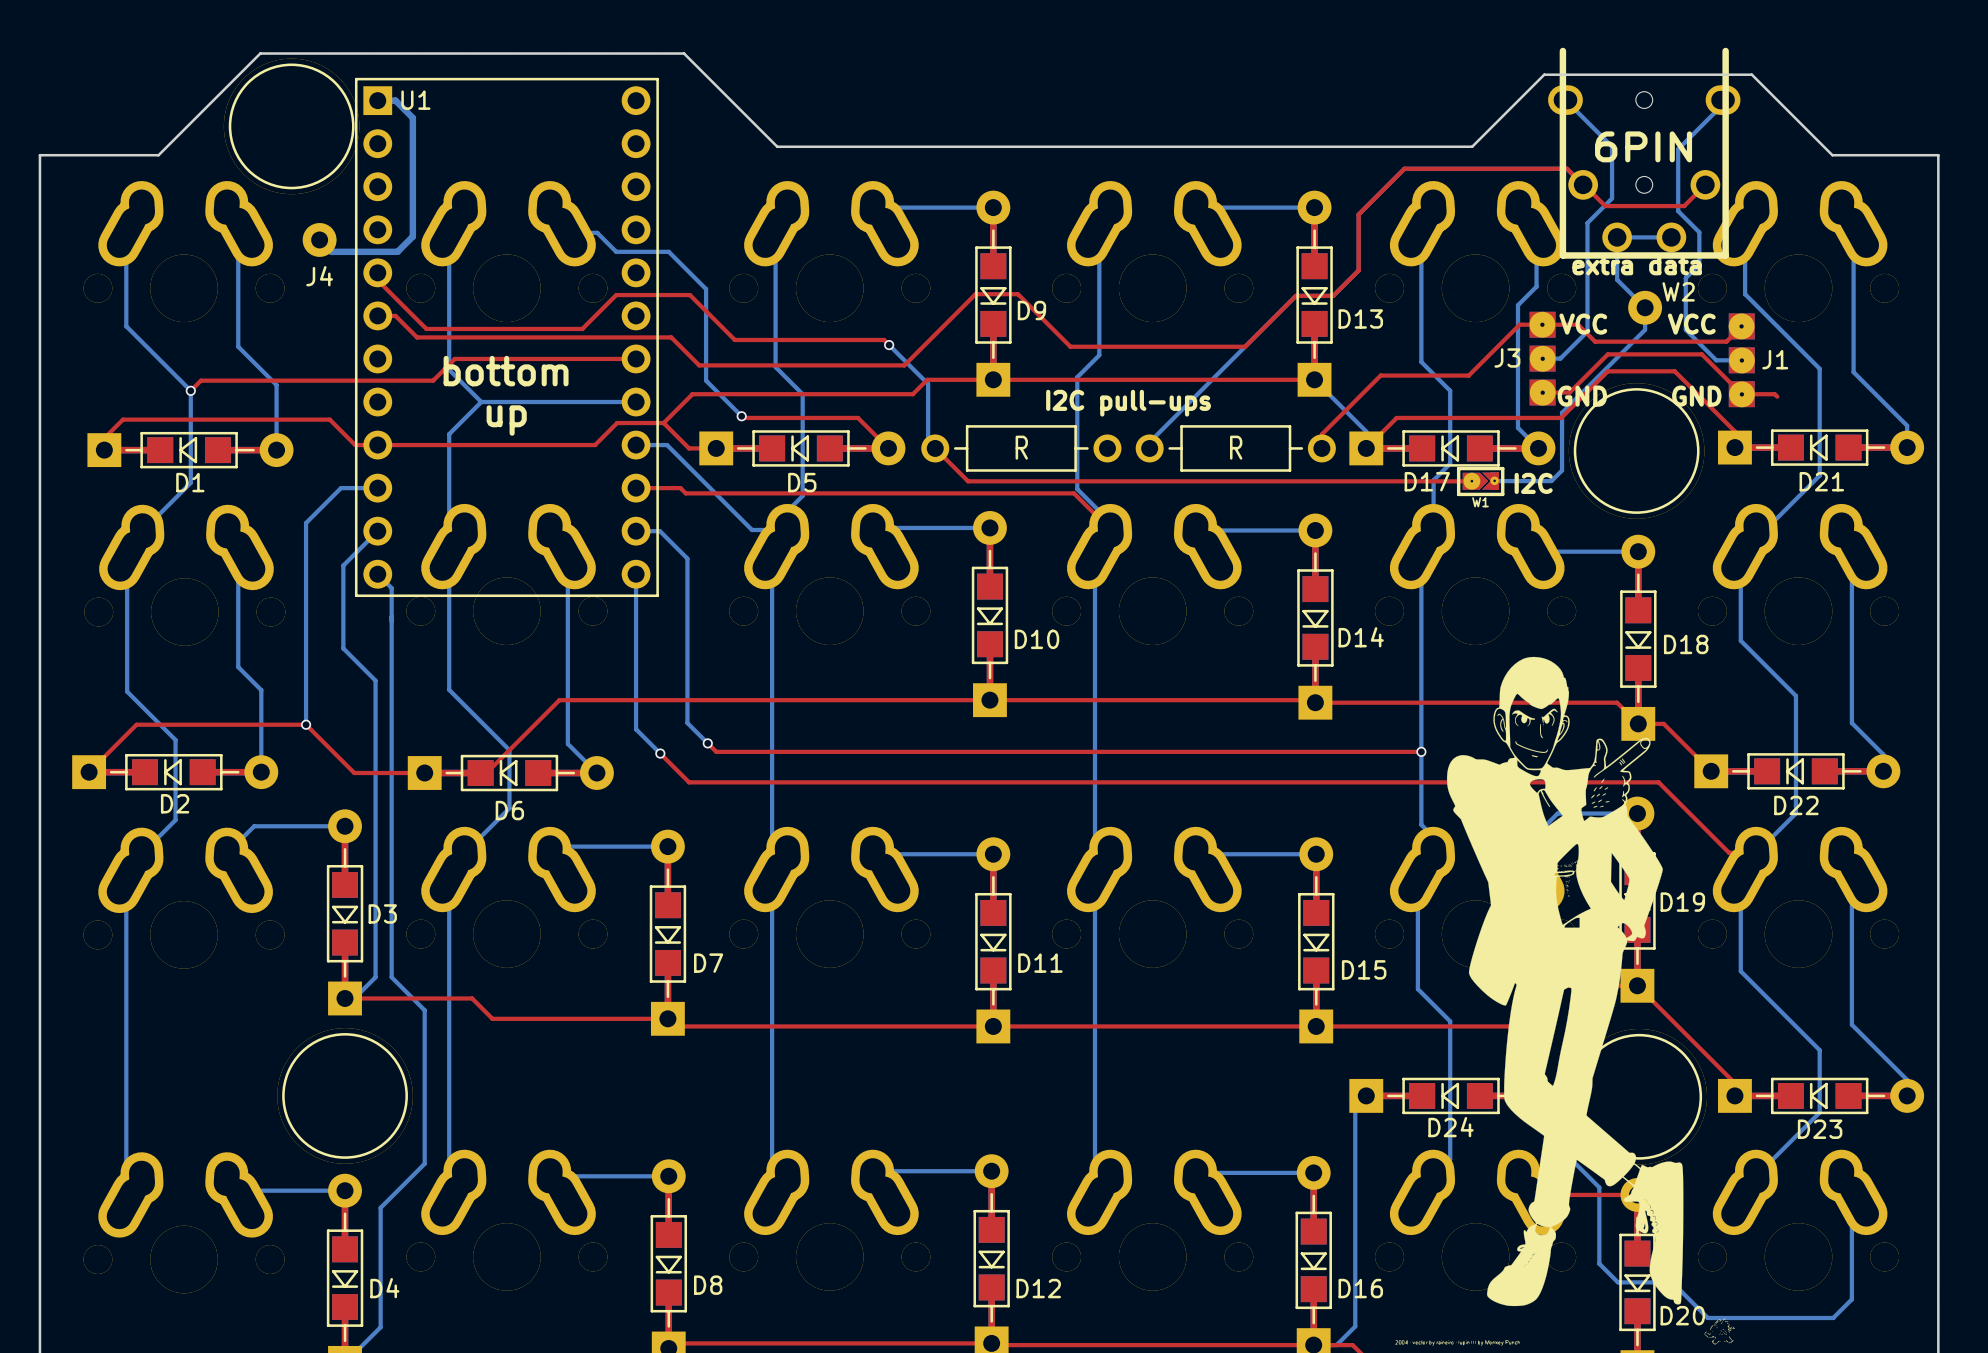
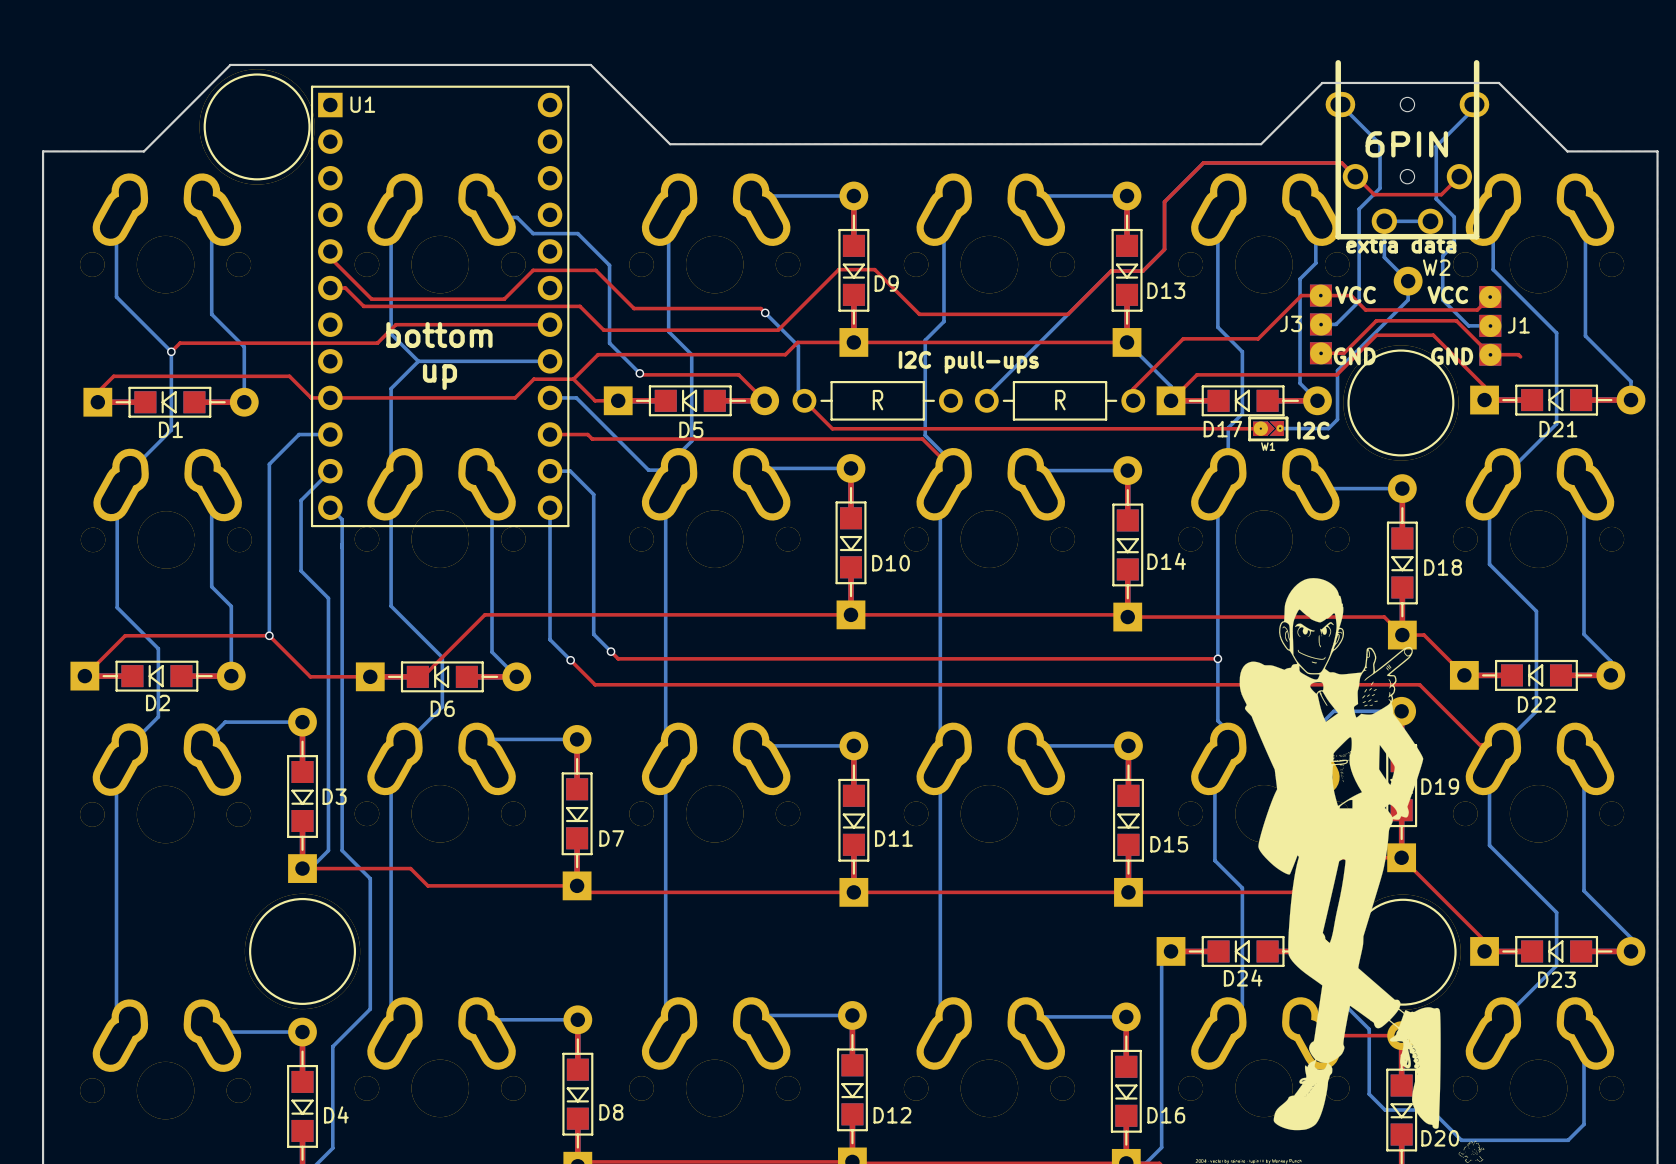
bottom track: (377, 100) (395, 100) (412, 117) (412, 236) (397, 251) (331, 251) (319, 239) -> none
J4: (319, 239) -> none

